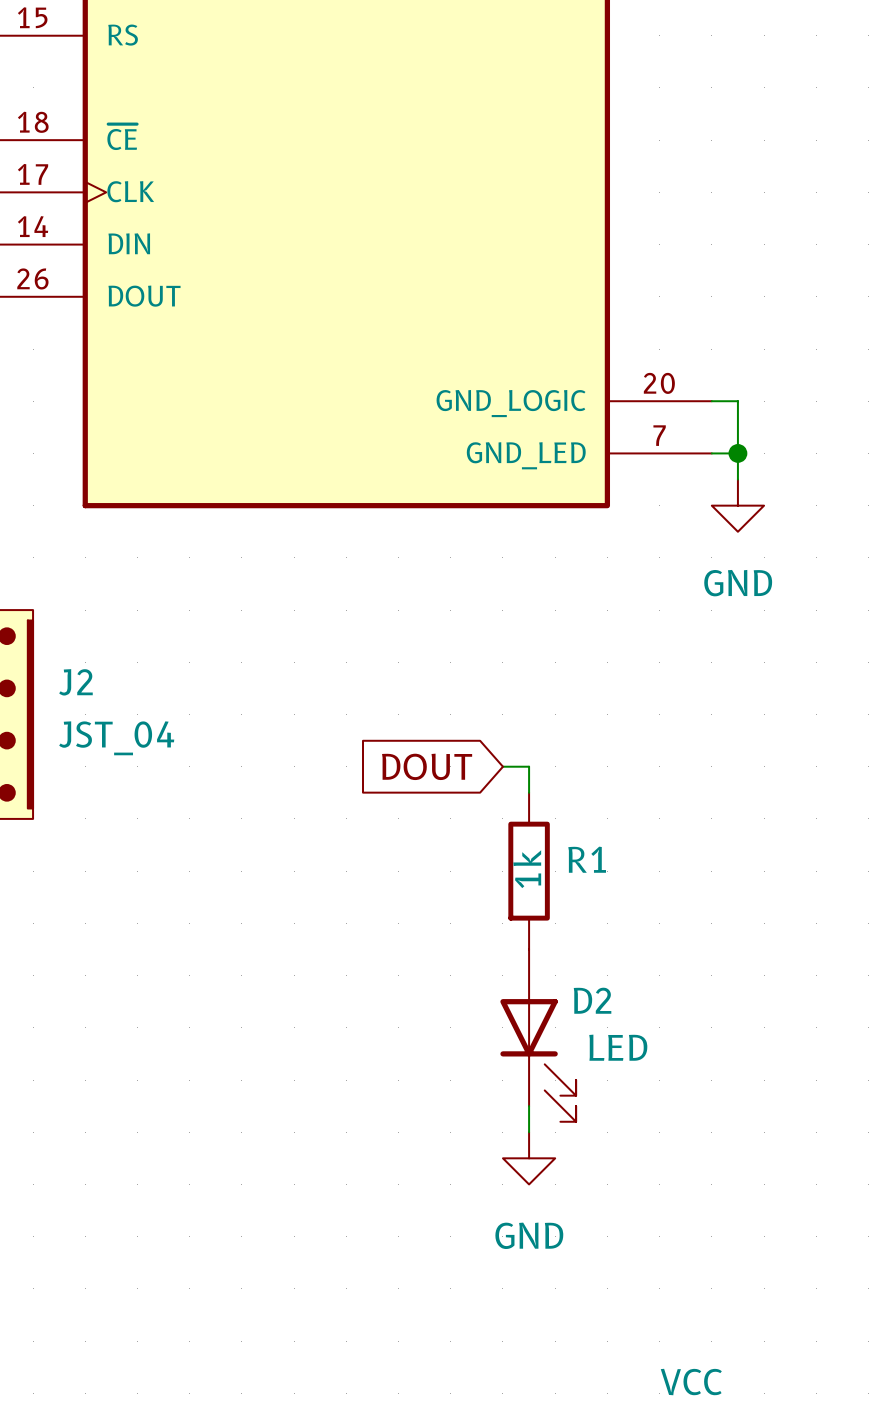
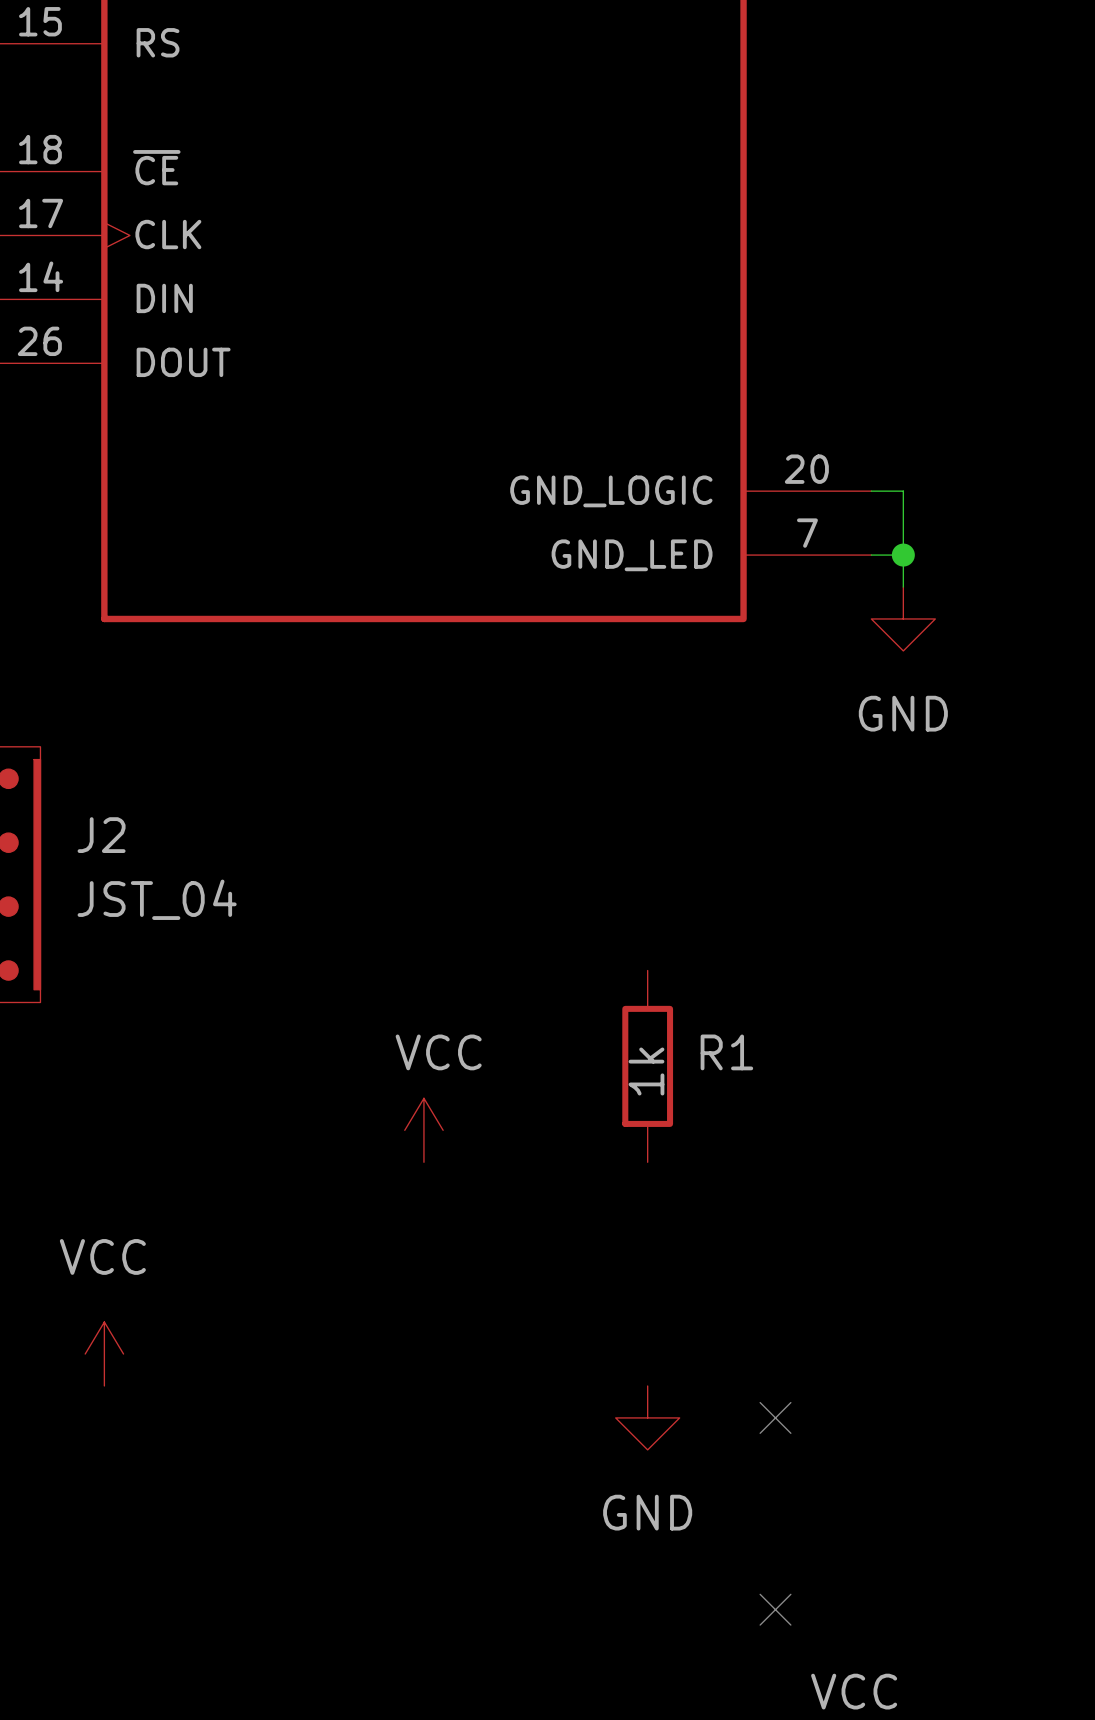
global label: DOUT (427, 766) -> none
wire: (502, 766) (529, 766) (529, 792) -> none
power symbol: none -> VCC (423, 1130)
D2: LED (538, 1035) -> none
power symbol: none -> VCC (104, 1354)
wire: (529, 1106) (529, 1132) -> none
no-connect mark: none -> (775, 1417)
no-connect mark: none -> (775, 1609)

